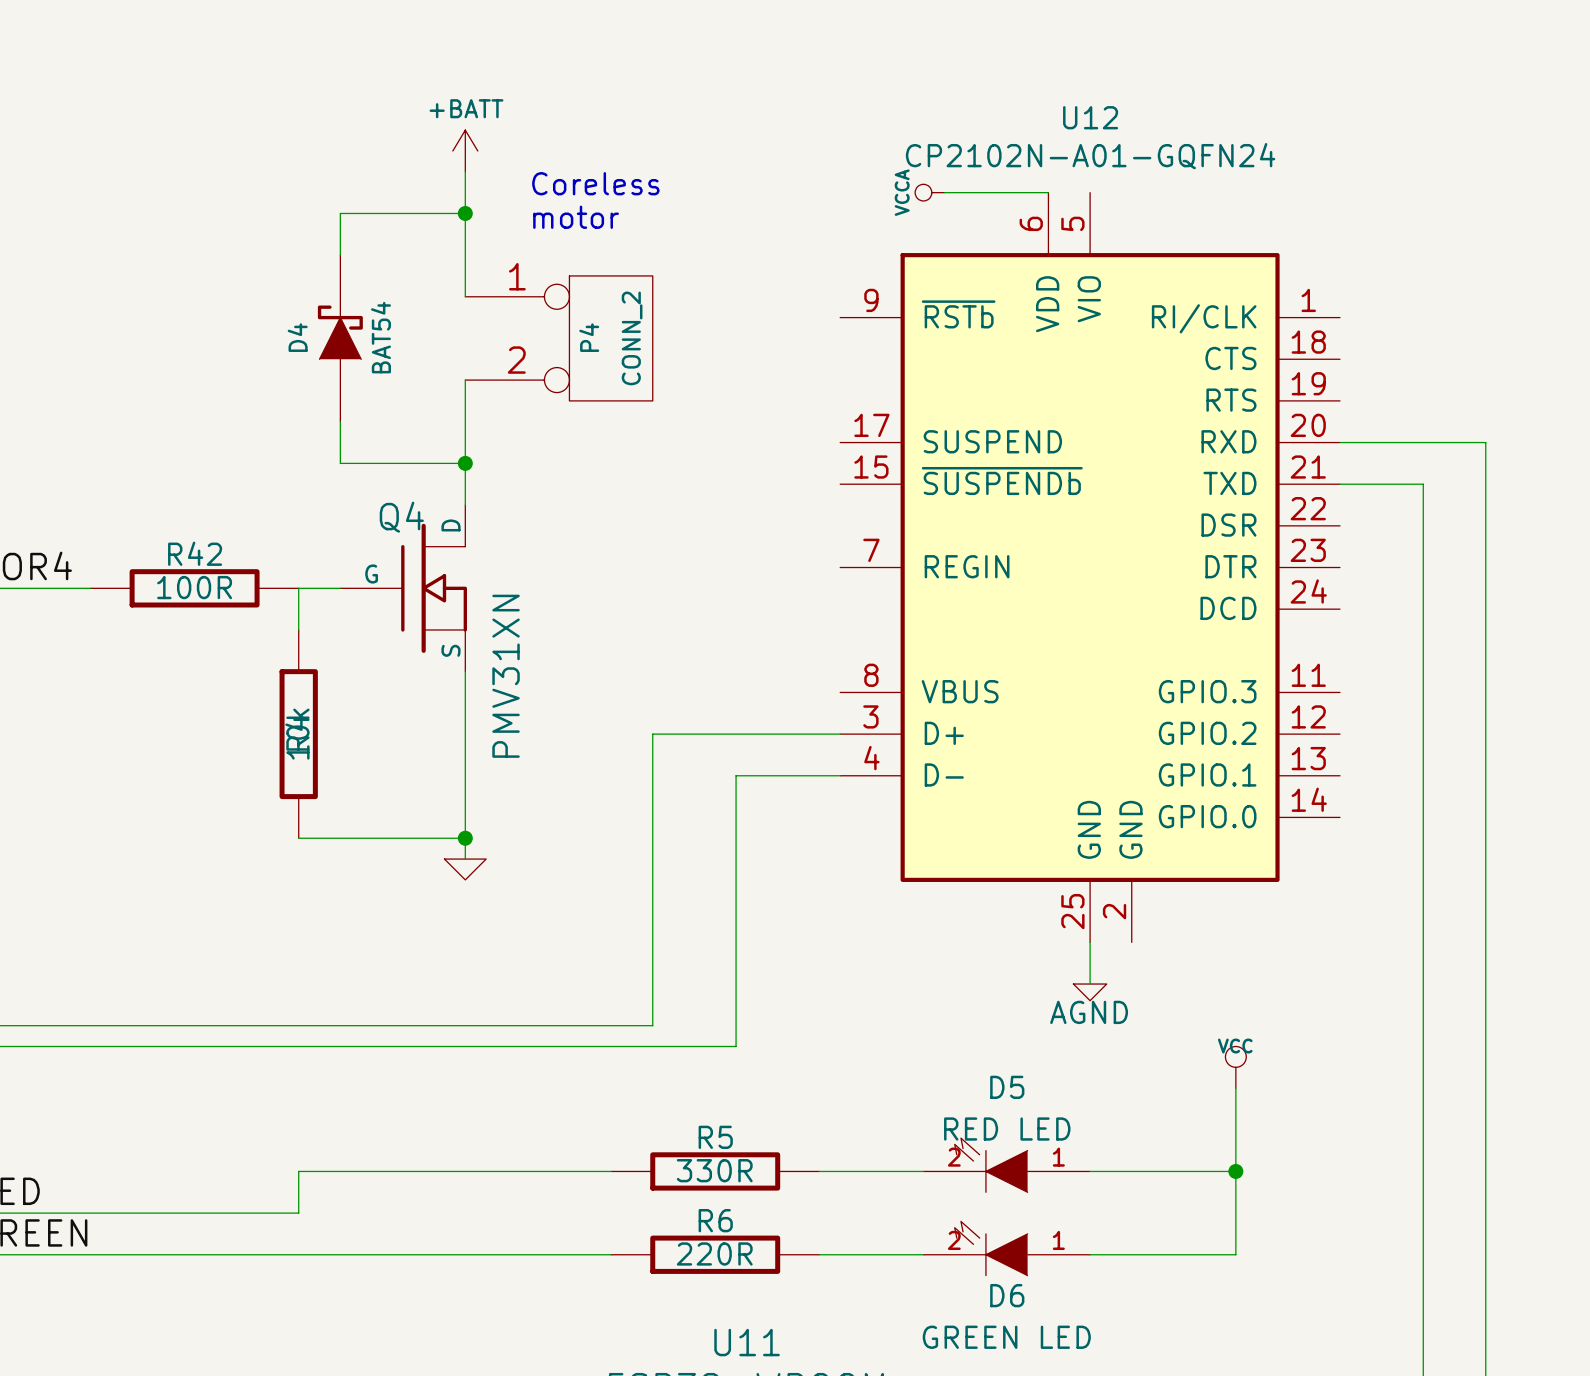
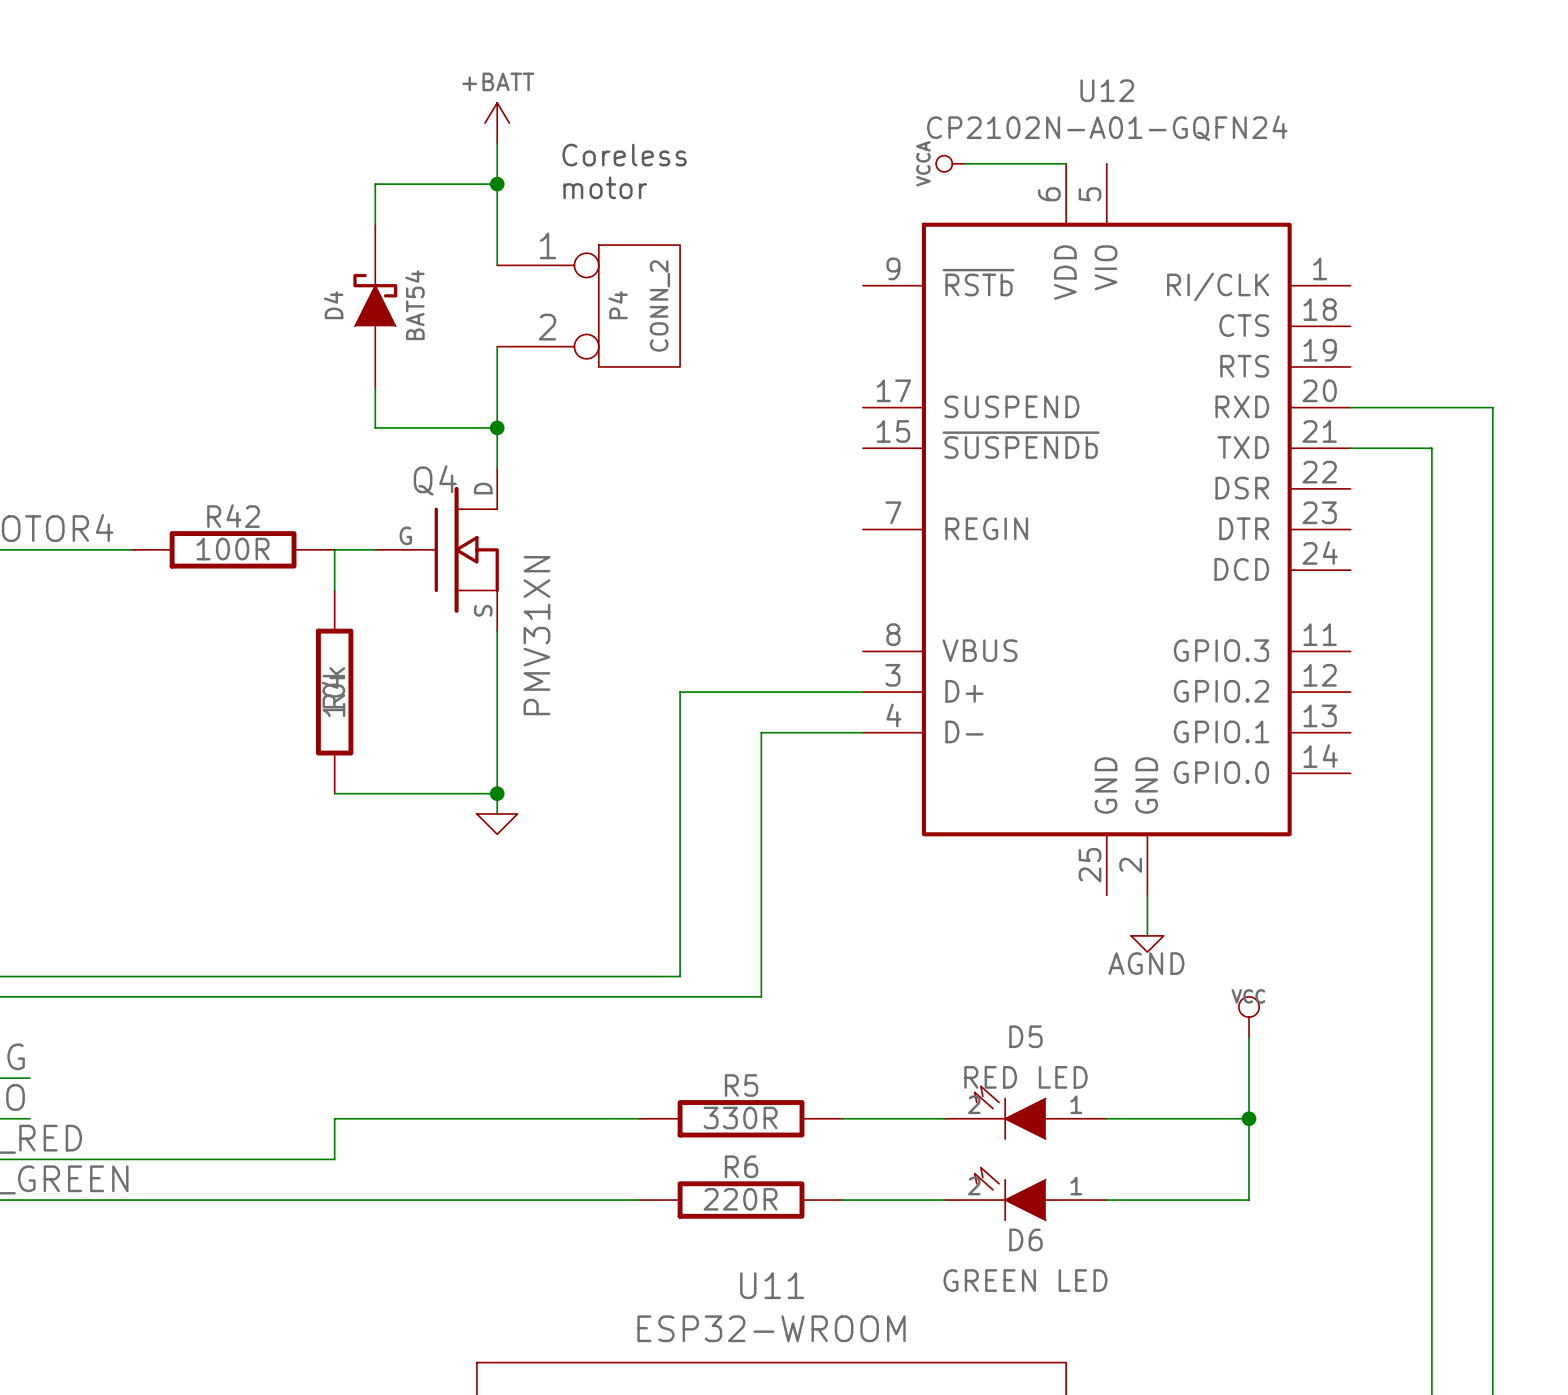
wire: (1090, 942) (1090, 984) -> (1147, 895) (1147, 935)
power symbol position: AGND (1090, 992) -> AGND (1147, 944)

